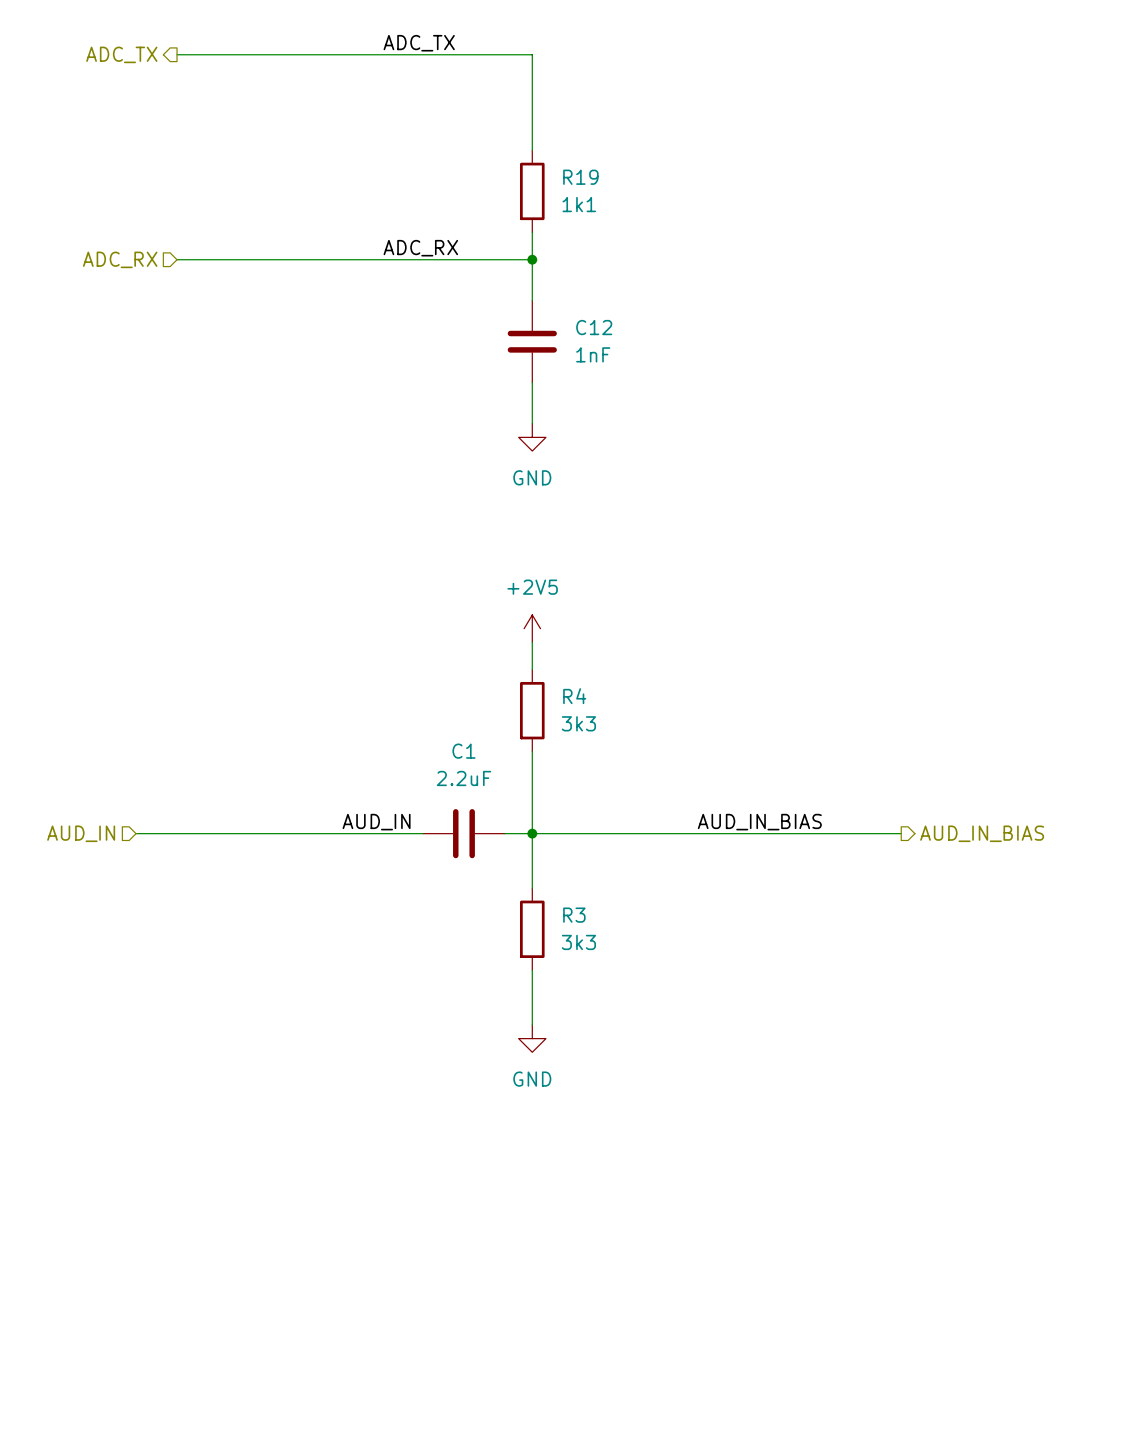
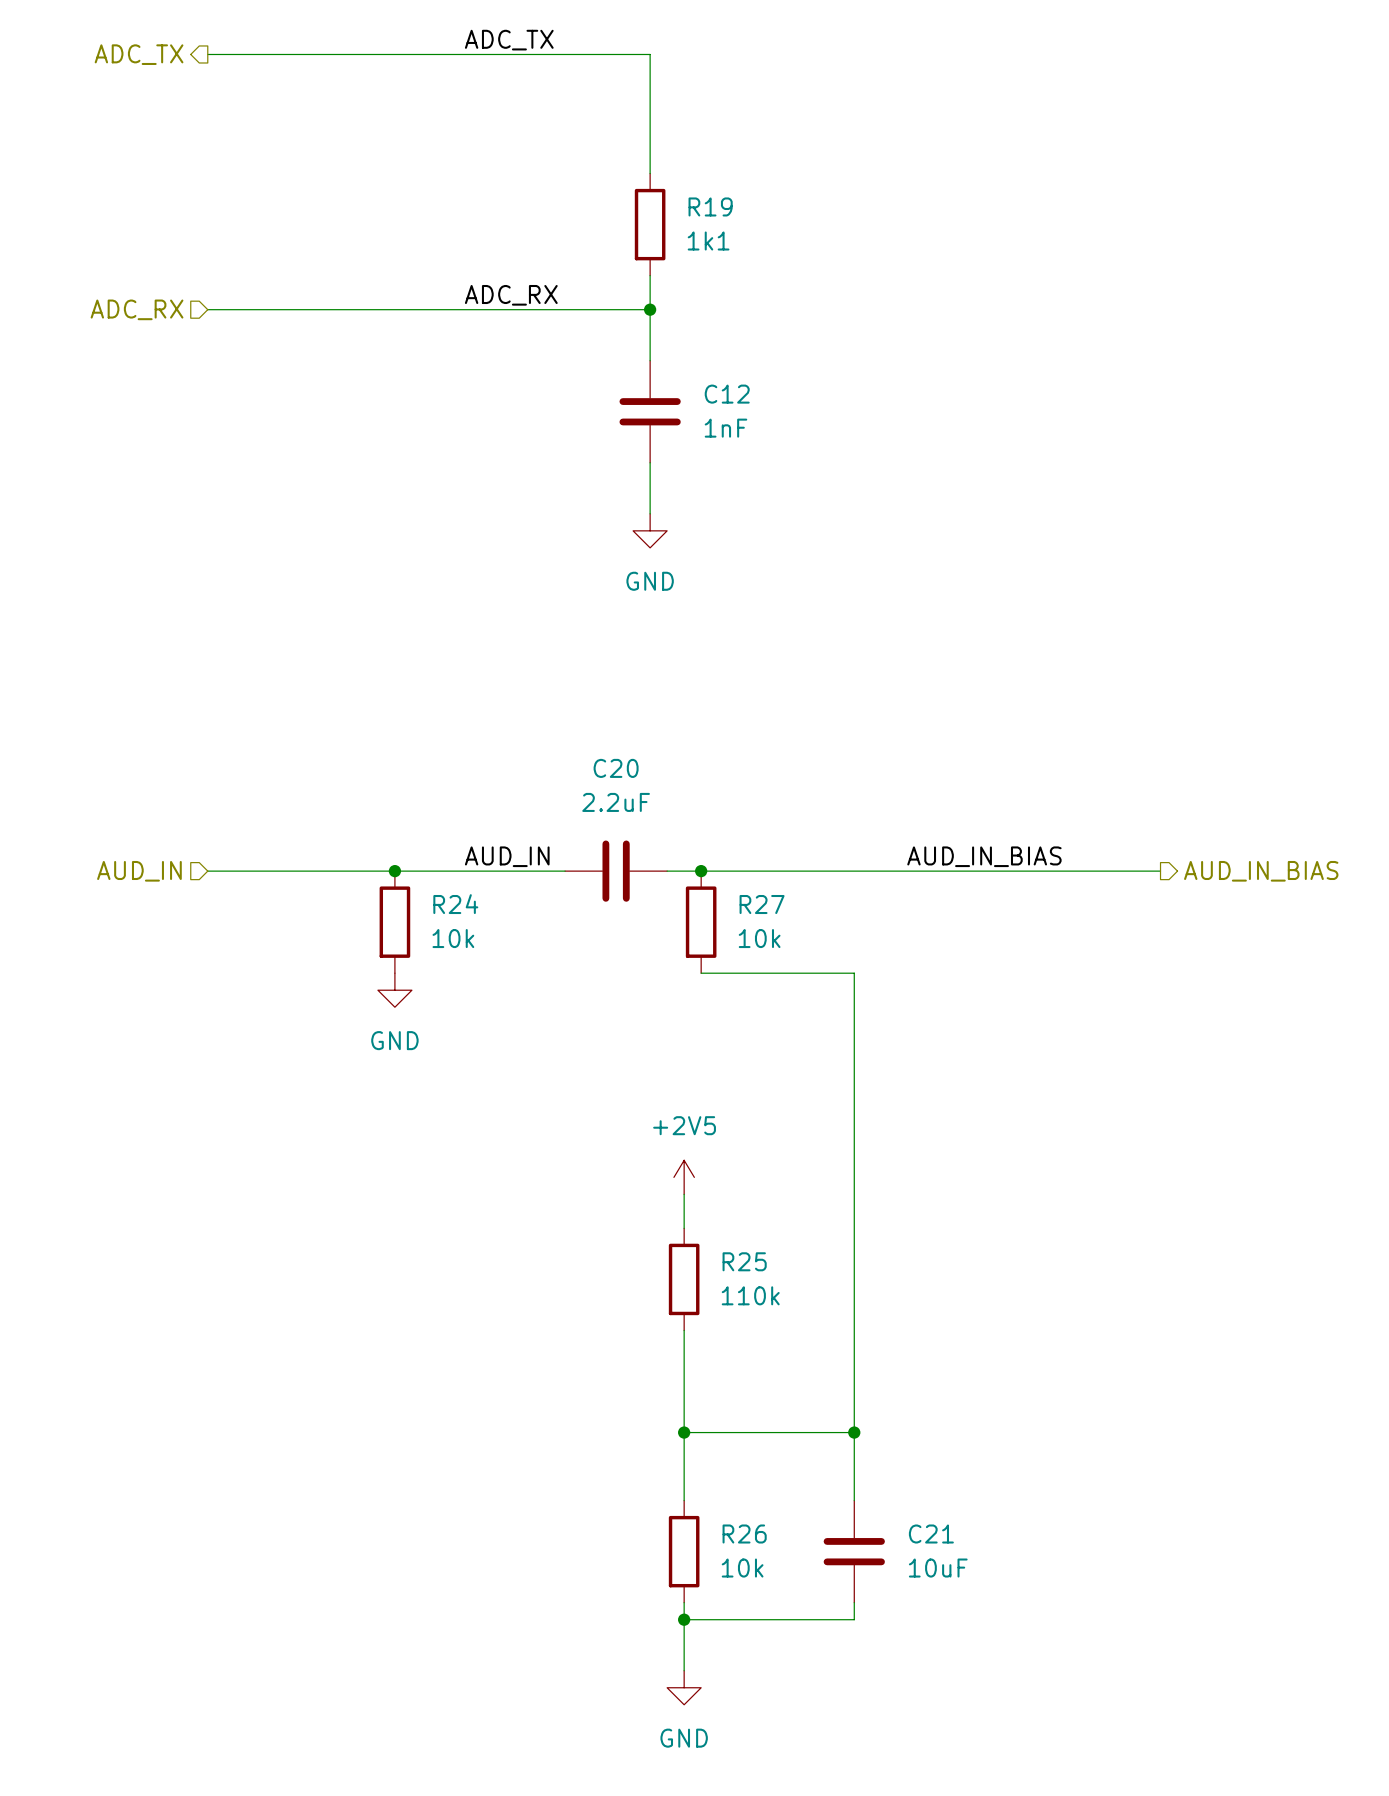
power symbol: +2V5 (532, 628) -> none
wire: (532, 642) (532, 669) -> none
junction: none -> (394, 871)
C20: none -> 2.2uF (616, 871)
R4: 3k3 (532, 710) -> none
junction: none -> (701, 871)
R24: none -> 10k (394, 922)
wire: (532, 751) (532, 888) -> none
R27: none -> 10k (701, 922)
wire: none -> (701, 973) (854, 973) (854, 1500)
power symbol: none -> GND (394, 990)
label position: AUD_IN (376, 822) -> AUD_IN (507, 856)
label position: AUD_IN_BIAS (759, 822) -> AUD_IN_BIAS (984, 856)
hierarchical label position: AUD_IN (81, 833) -> AUD_IN (139, 871)
wire: (136, 833) (422, 833) -> (207, 871) (565, 871)
C1: 2.2uF (463, 833) -> none
wire: (504, 833) (901, 833) -> (667, 871) (1160, 871)
junction: (532, 833) -> none
hierarchical label position: AUD_IN_BIAS (982, 833) -> AUD_IN_BIAS (1261, 871)
R3: 3k3 (532, 929) -> none
power symbol: none -> +2V5 (684, 1177)
wire: (532, 970) (532, 1024) -> none
wire: none -> (684, 1194) (684, 1228)
power symbol: GND (532, 1038) -> none
R25: none -> 110k (684, 1279)
wire: none -> (684, 1330) (684, 1500)
wire: none -> (684, 1432) (854, 1432)
junction: none -> (684, 1432)
junction: none -> (854, 1432)
R26: none -> 10k (684, 1551)
C21: none -> 10uF (854, 1551)
wire: none -> (684, 1602) (684, 1670)
wire: none -> (854, 1602) (854, 1619) (684, 1619)
junction: none -> (684, 1619)
power symbol: none -> GND (684, 1687)

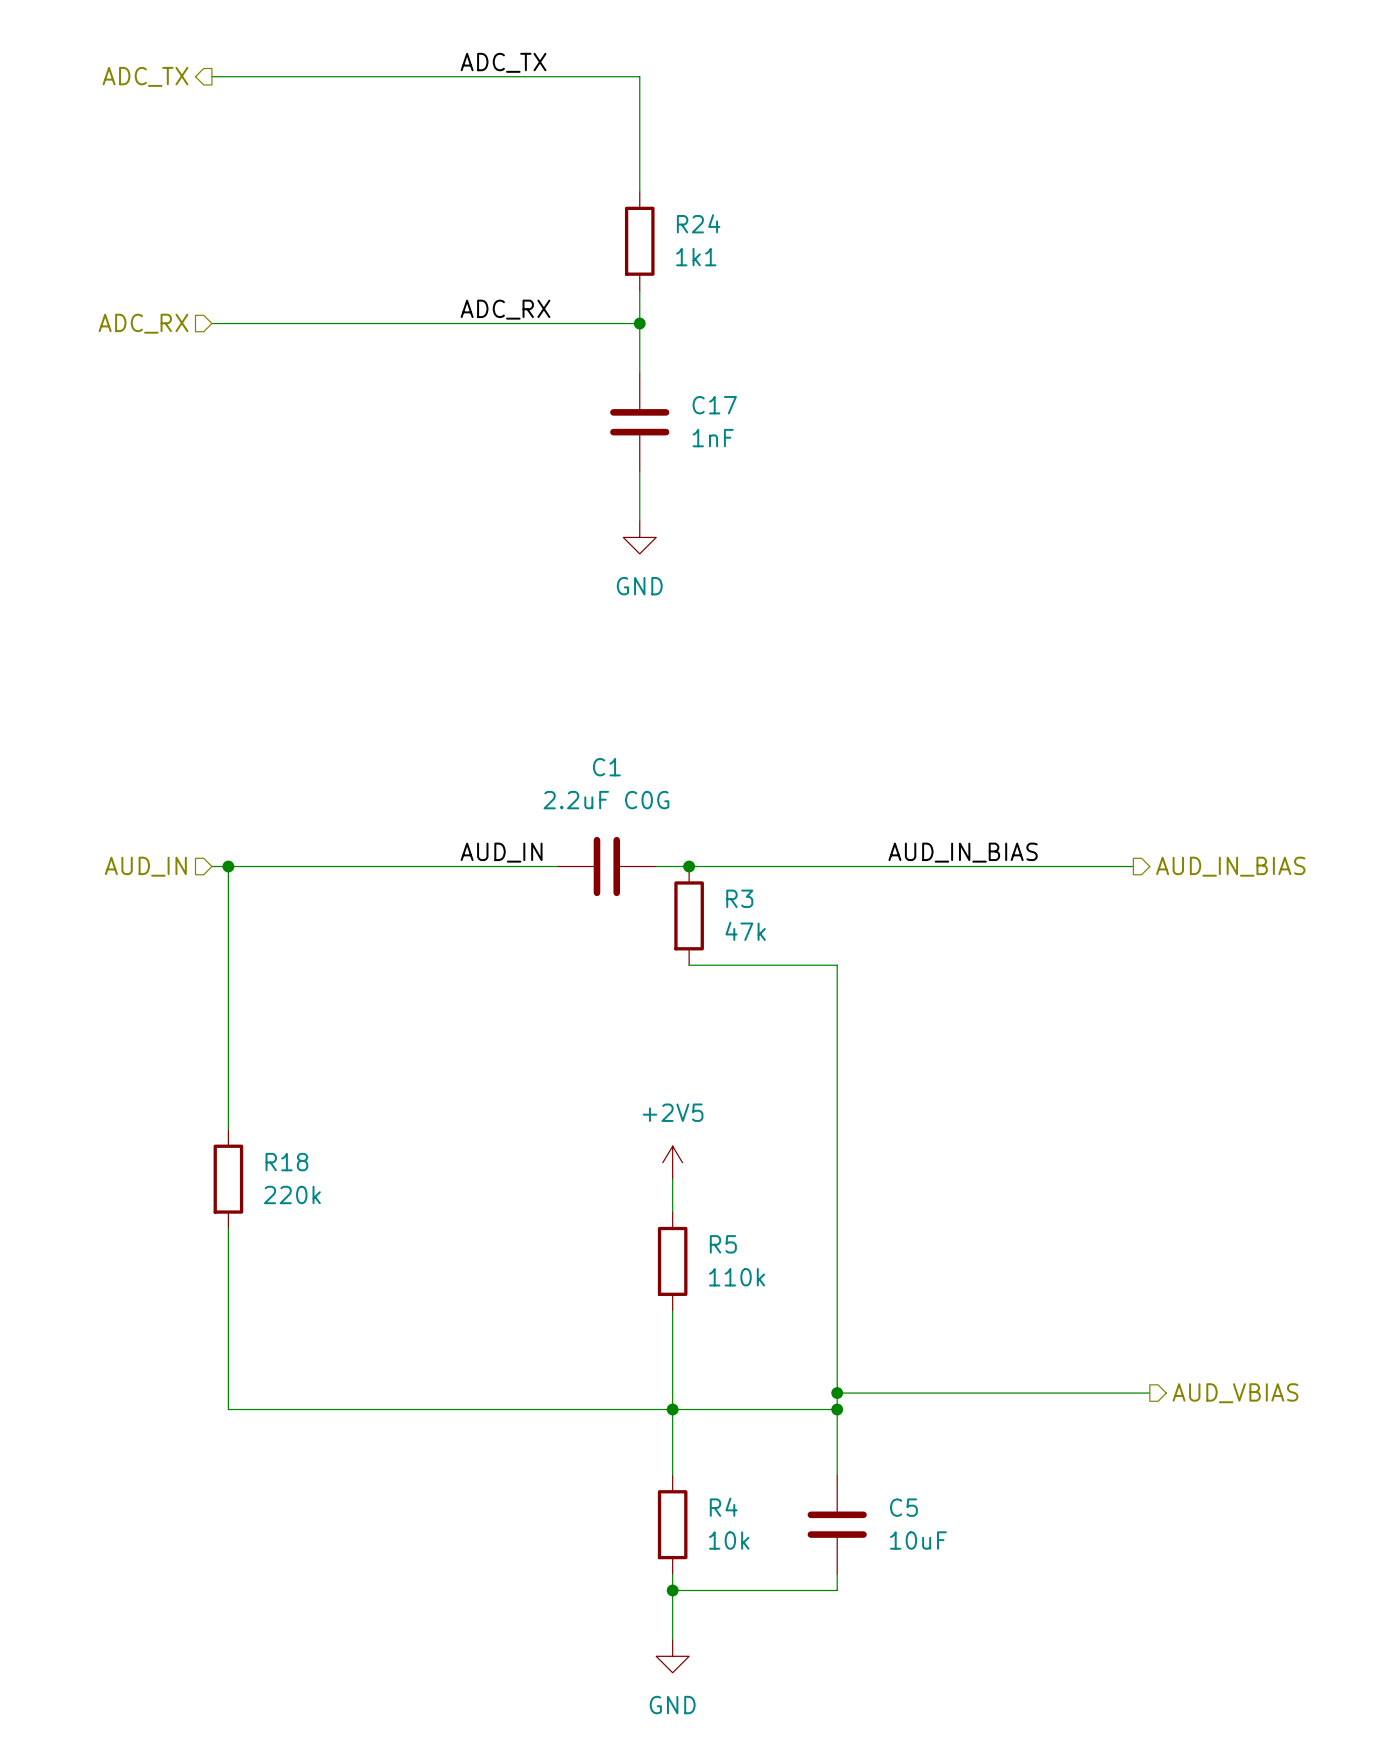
R19 name: R19 (710, 206) -> R24 (698, 223)
C12 name: C12 (727, 394) -> C17 (714, 405)
C20 name: C20 (616, 768) -> C1 (606, 767)
C20 value: 2.2uF (616, 802) -> 2.2uF C0G (606, 800)
wire: none -> (228, 866) (228, 1129)
junction: none -> (228, 866)
junction: (394, 871) -> none
R27 name: R27 (762, 904) -> R3 (739, 898)
R24: 10k (394, 922) -> none
R27 value: 10k (759, 938) -> 47k (745, 931)
power symbol: GND (394, 990) -> none
R18: none -> 220k (228, 1179)
wire: none -> (228, 1228) (228, 1409) (672, 1409)
R25 name: R25 (744, 1261) -> R5 (723, 1244)
wire: none -> (837, 1393) (1149, 1393)
junction: none -> (837, 1393)
hierarchical label: none -> AUD_VBIAS (1235, 1393)
R26 name: R26 (744, 1534) -> R4 (723, 1507)
C21 name: C21 (931, 1534) -> C5 (903, 1507)

